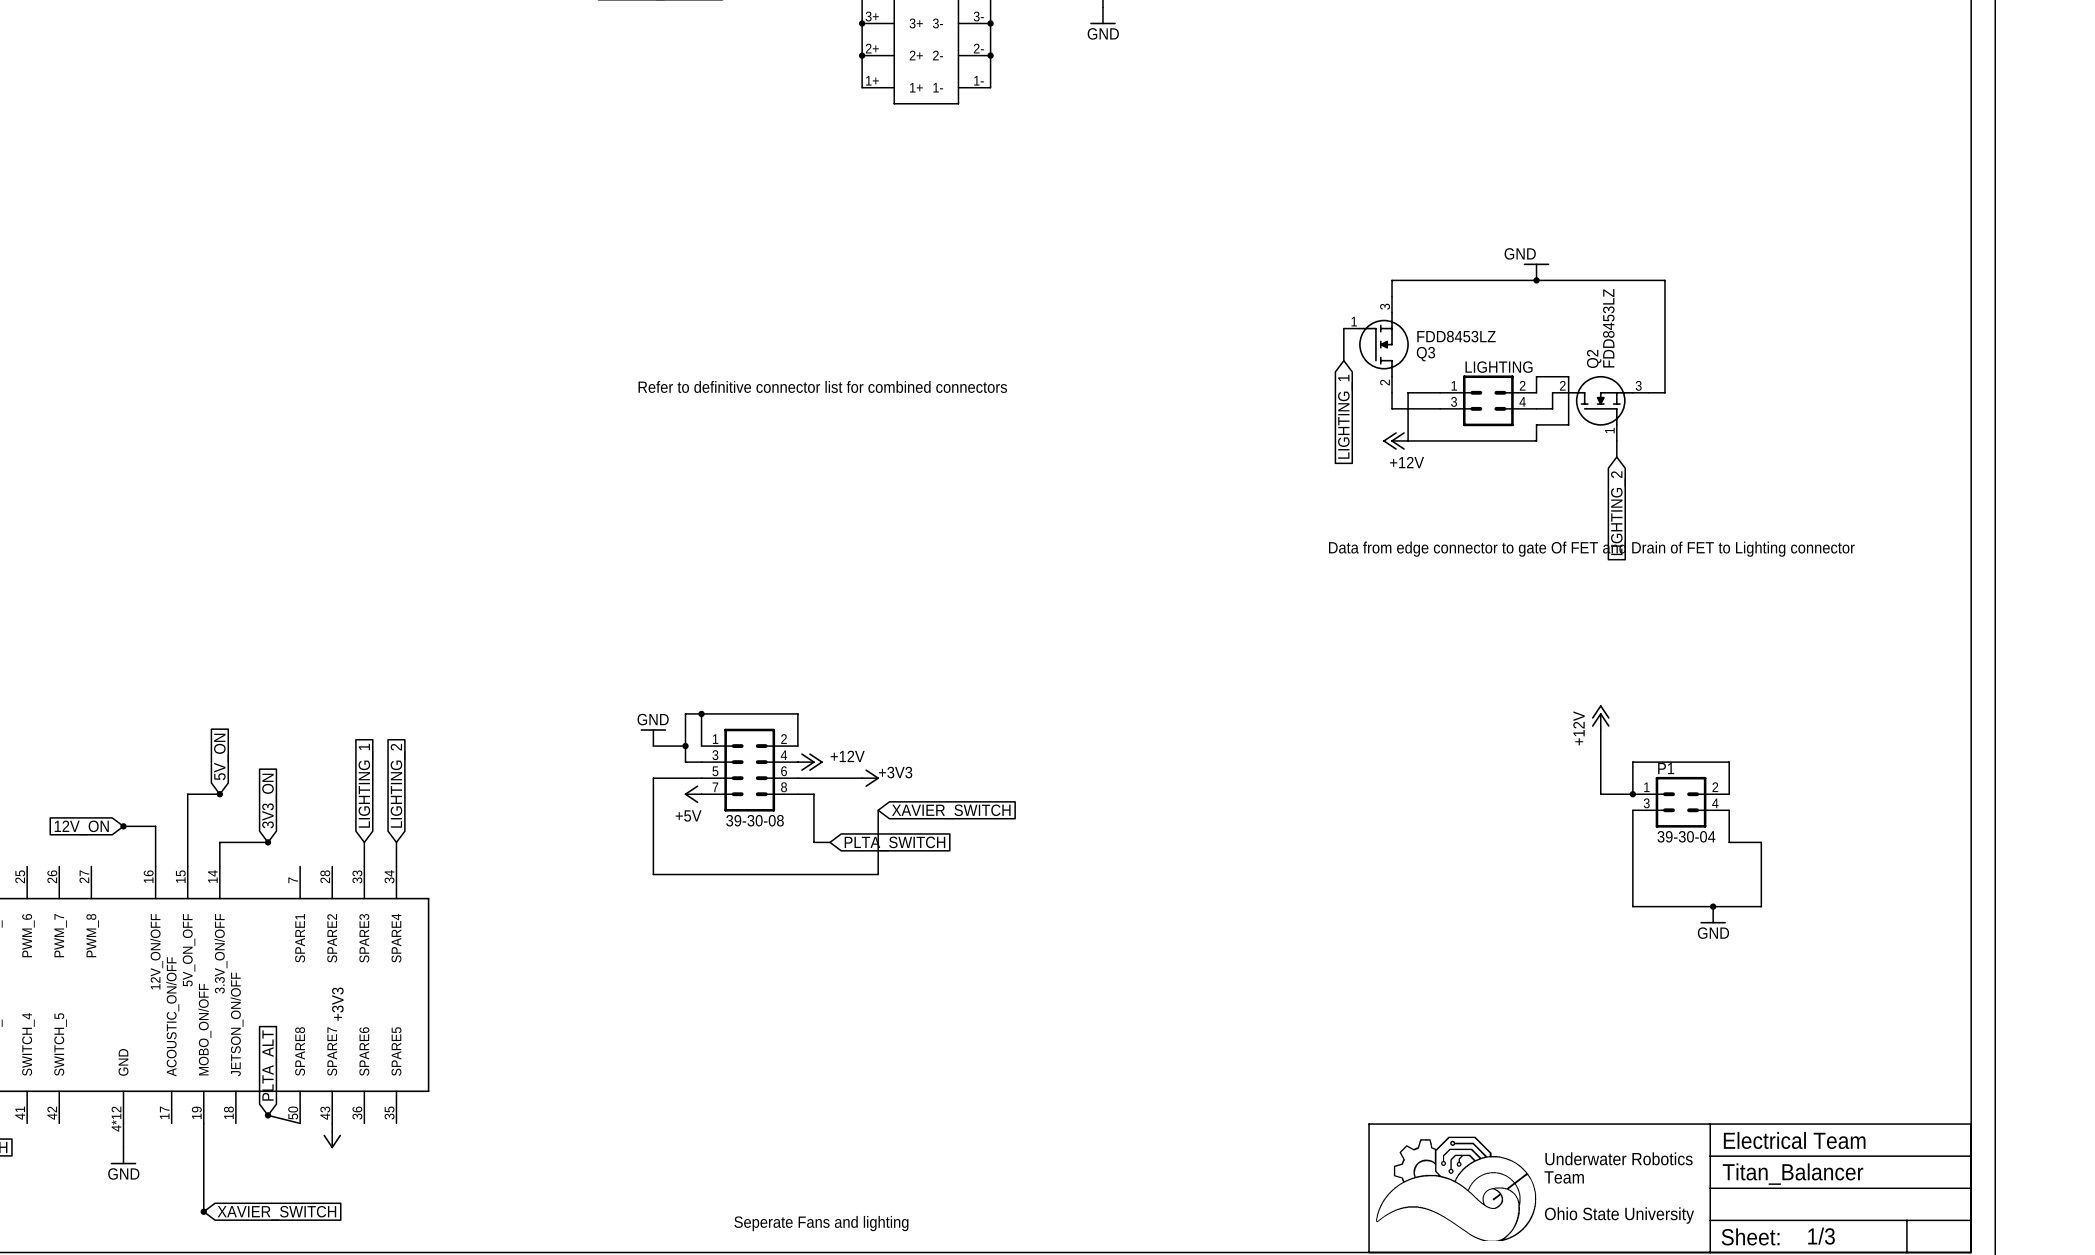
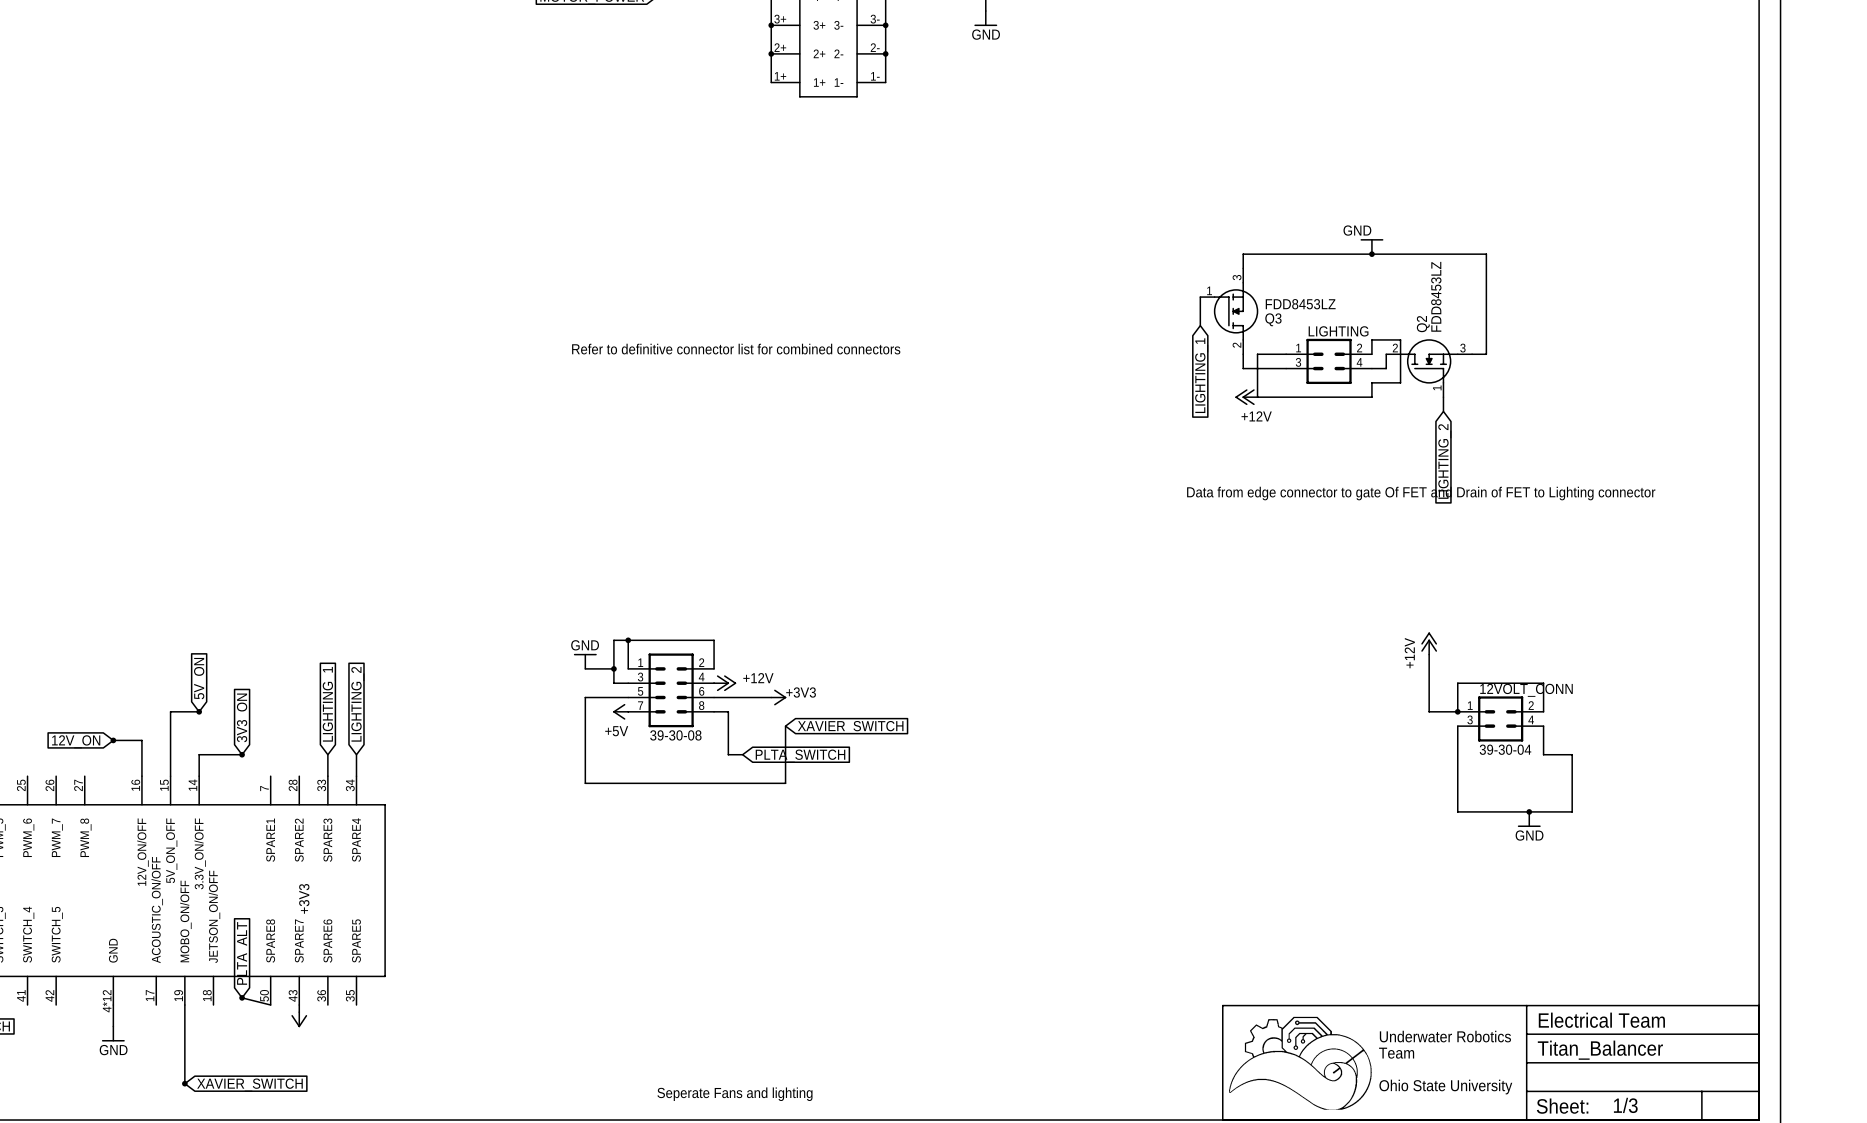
P1 name: P1 (1666, 768) -> 12VOLT_CONN (1526, 690)

